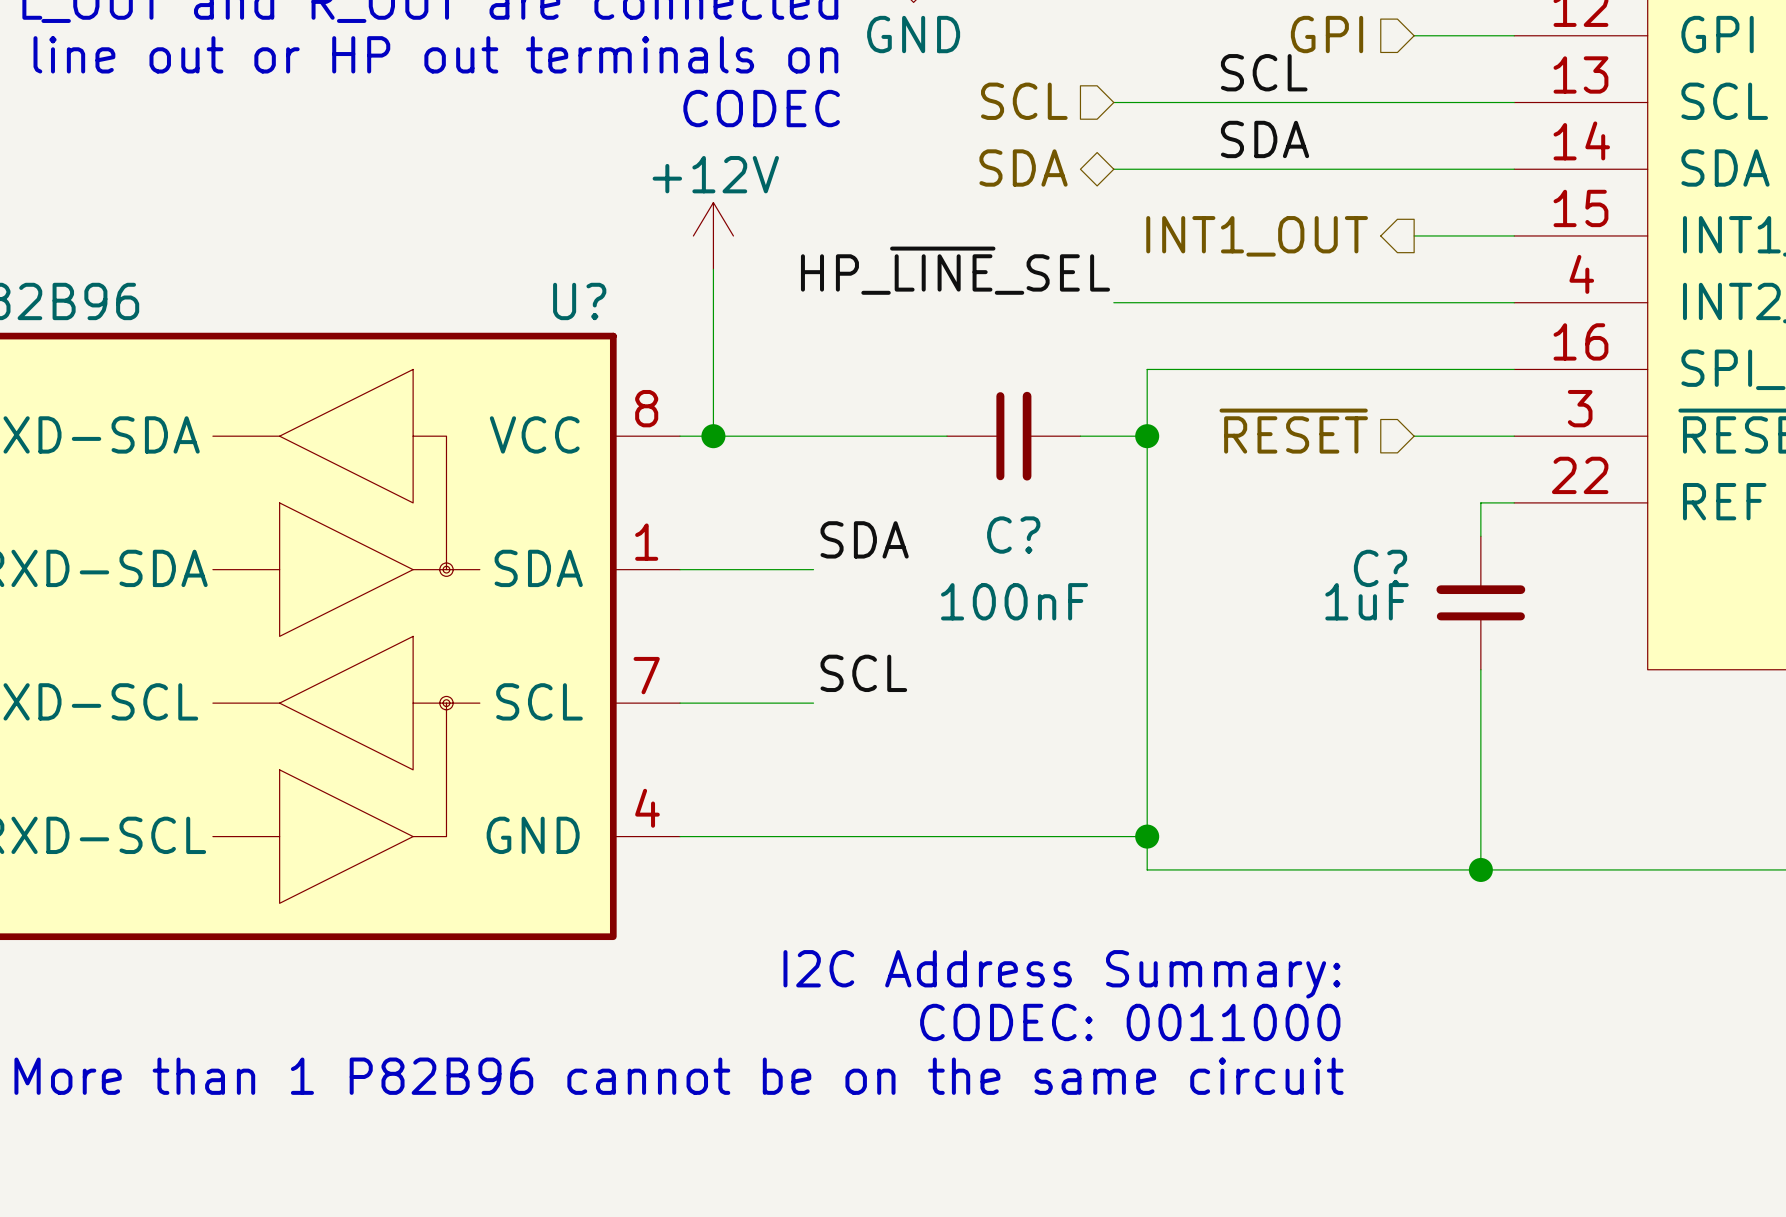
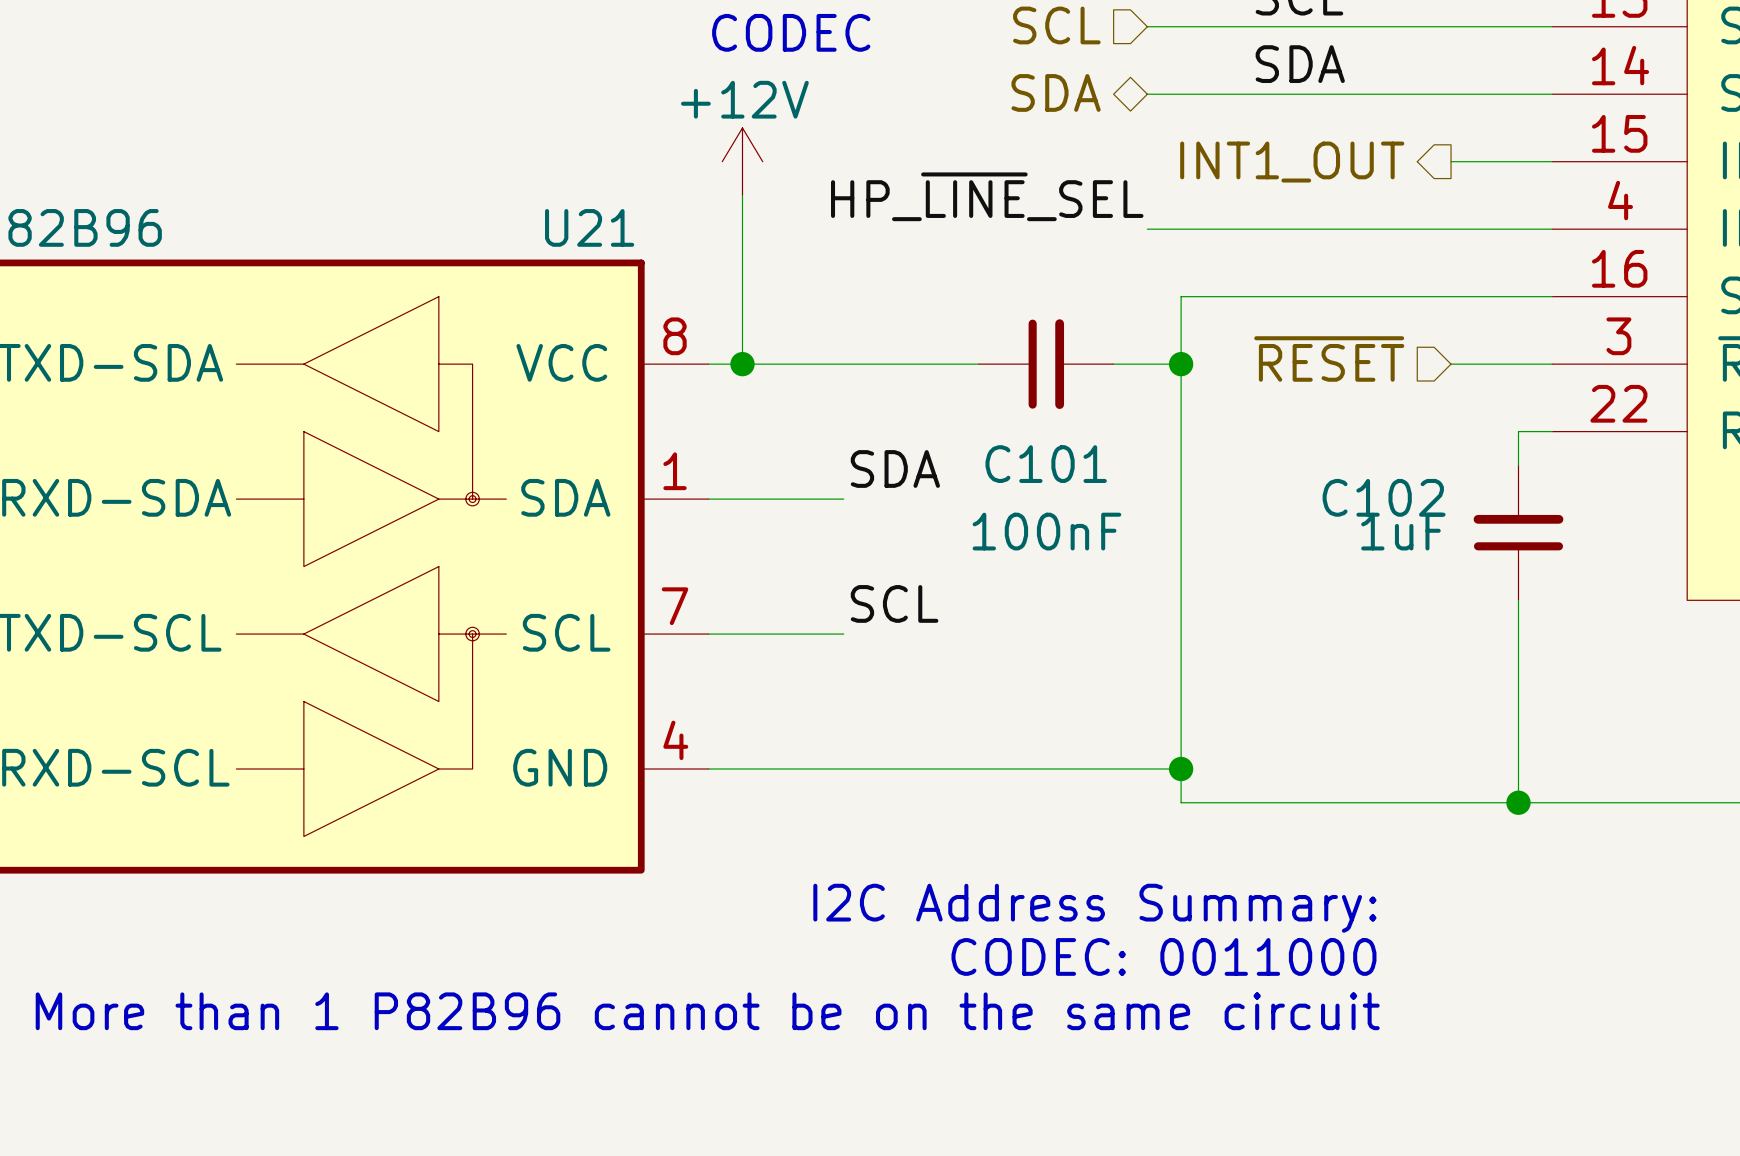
U? name: U? (579, 301) -> U21 (589, 227)
C? name: C? (1013, 535) -> C101 (1046, 464)
C? name: C? (1380, 568) -> C102 (1383, 497)

